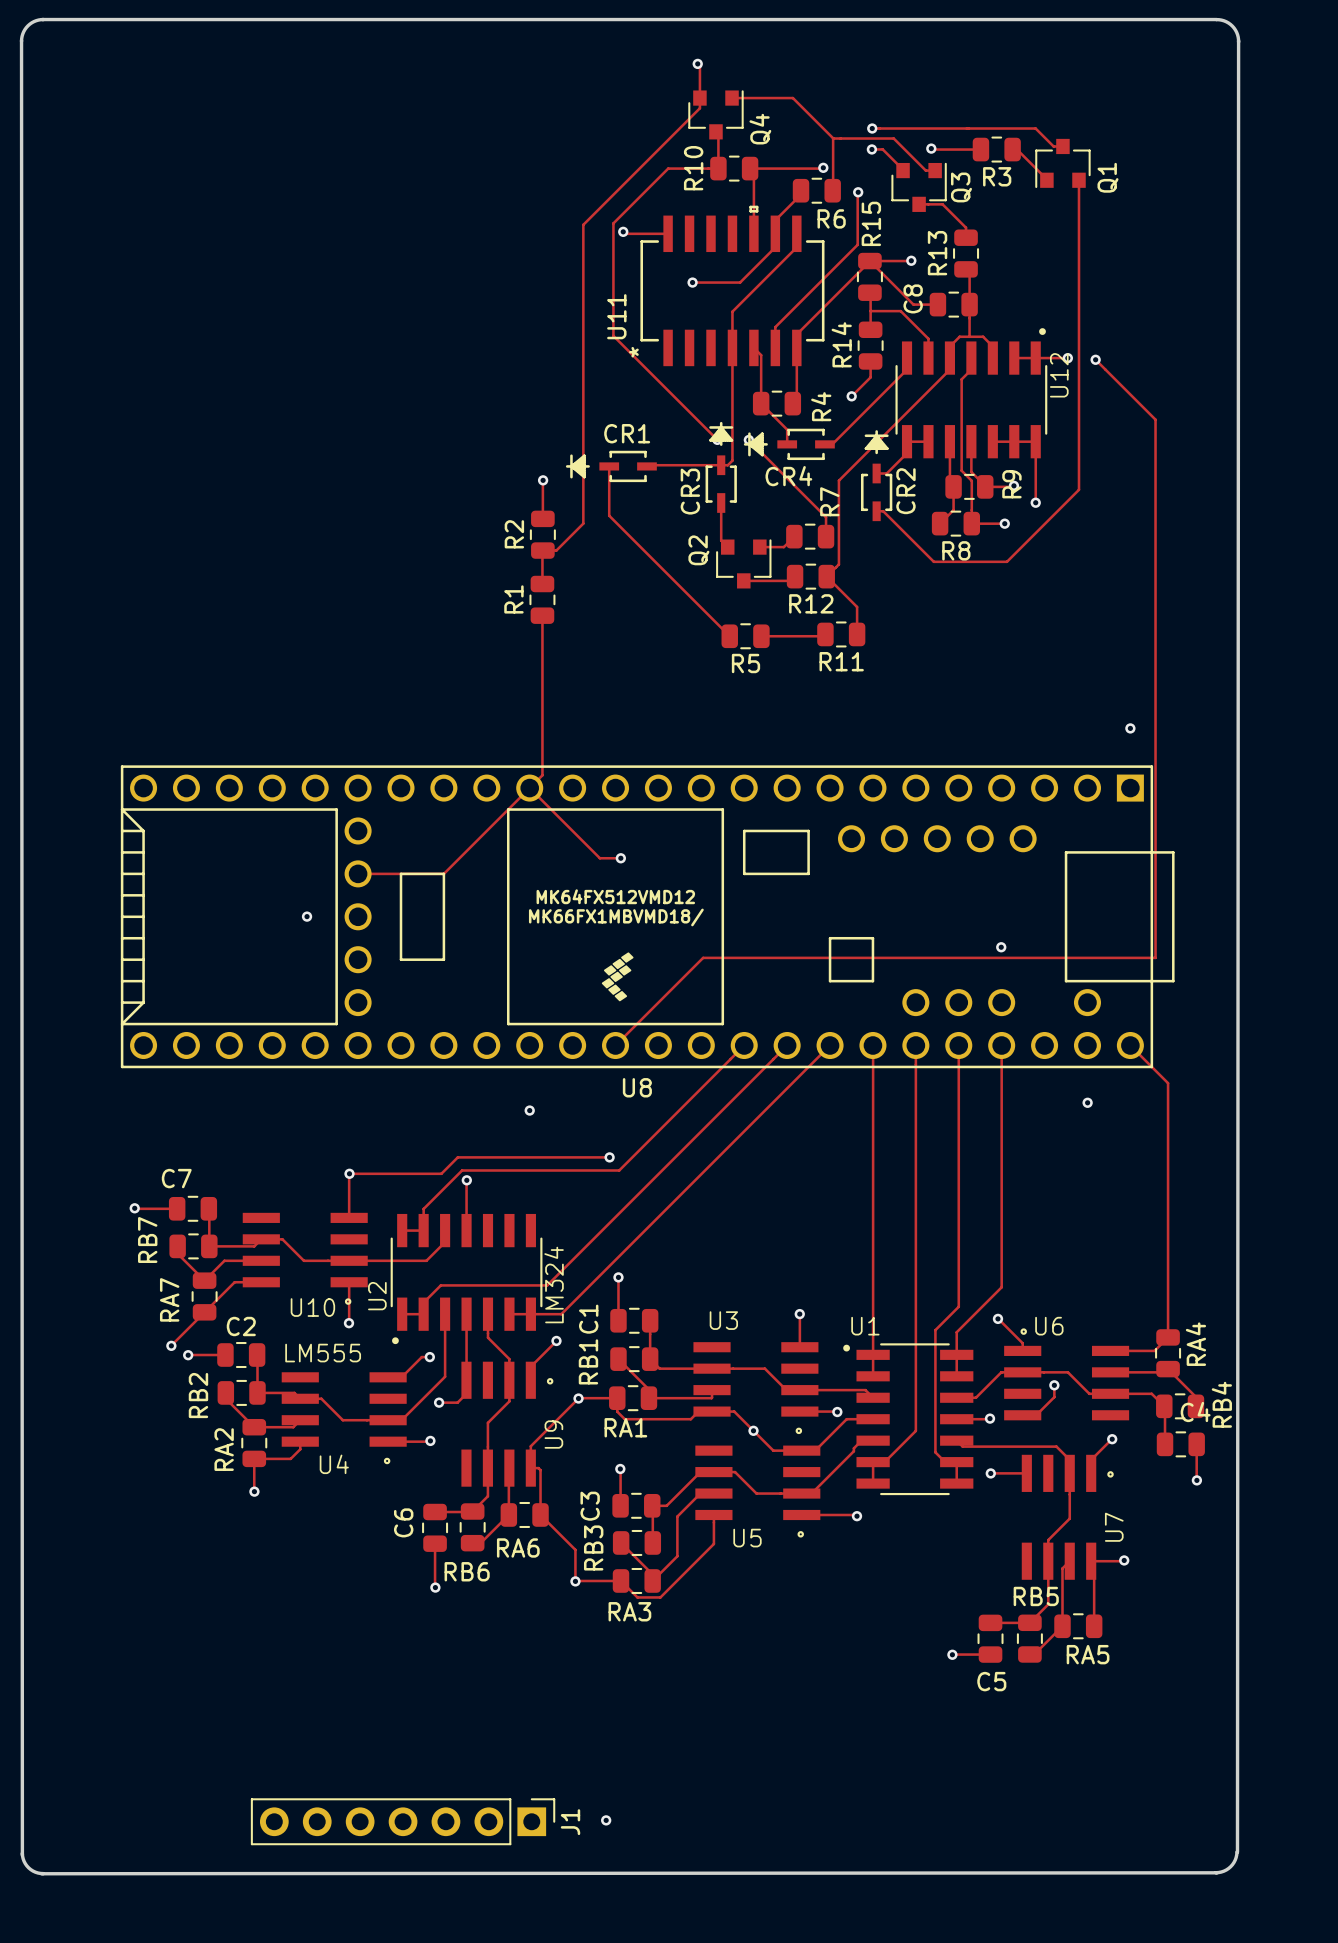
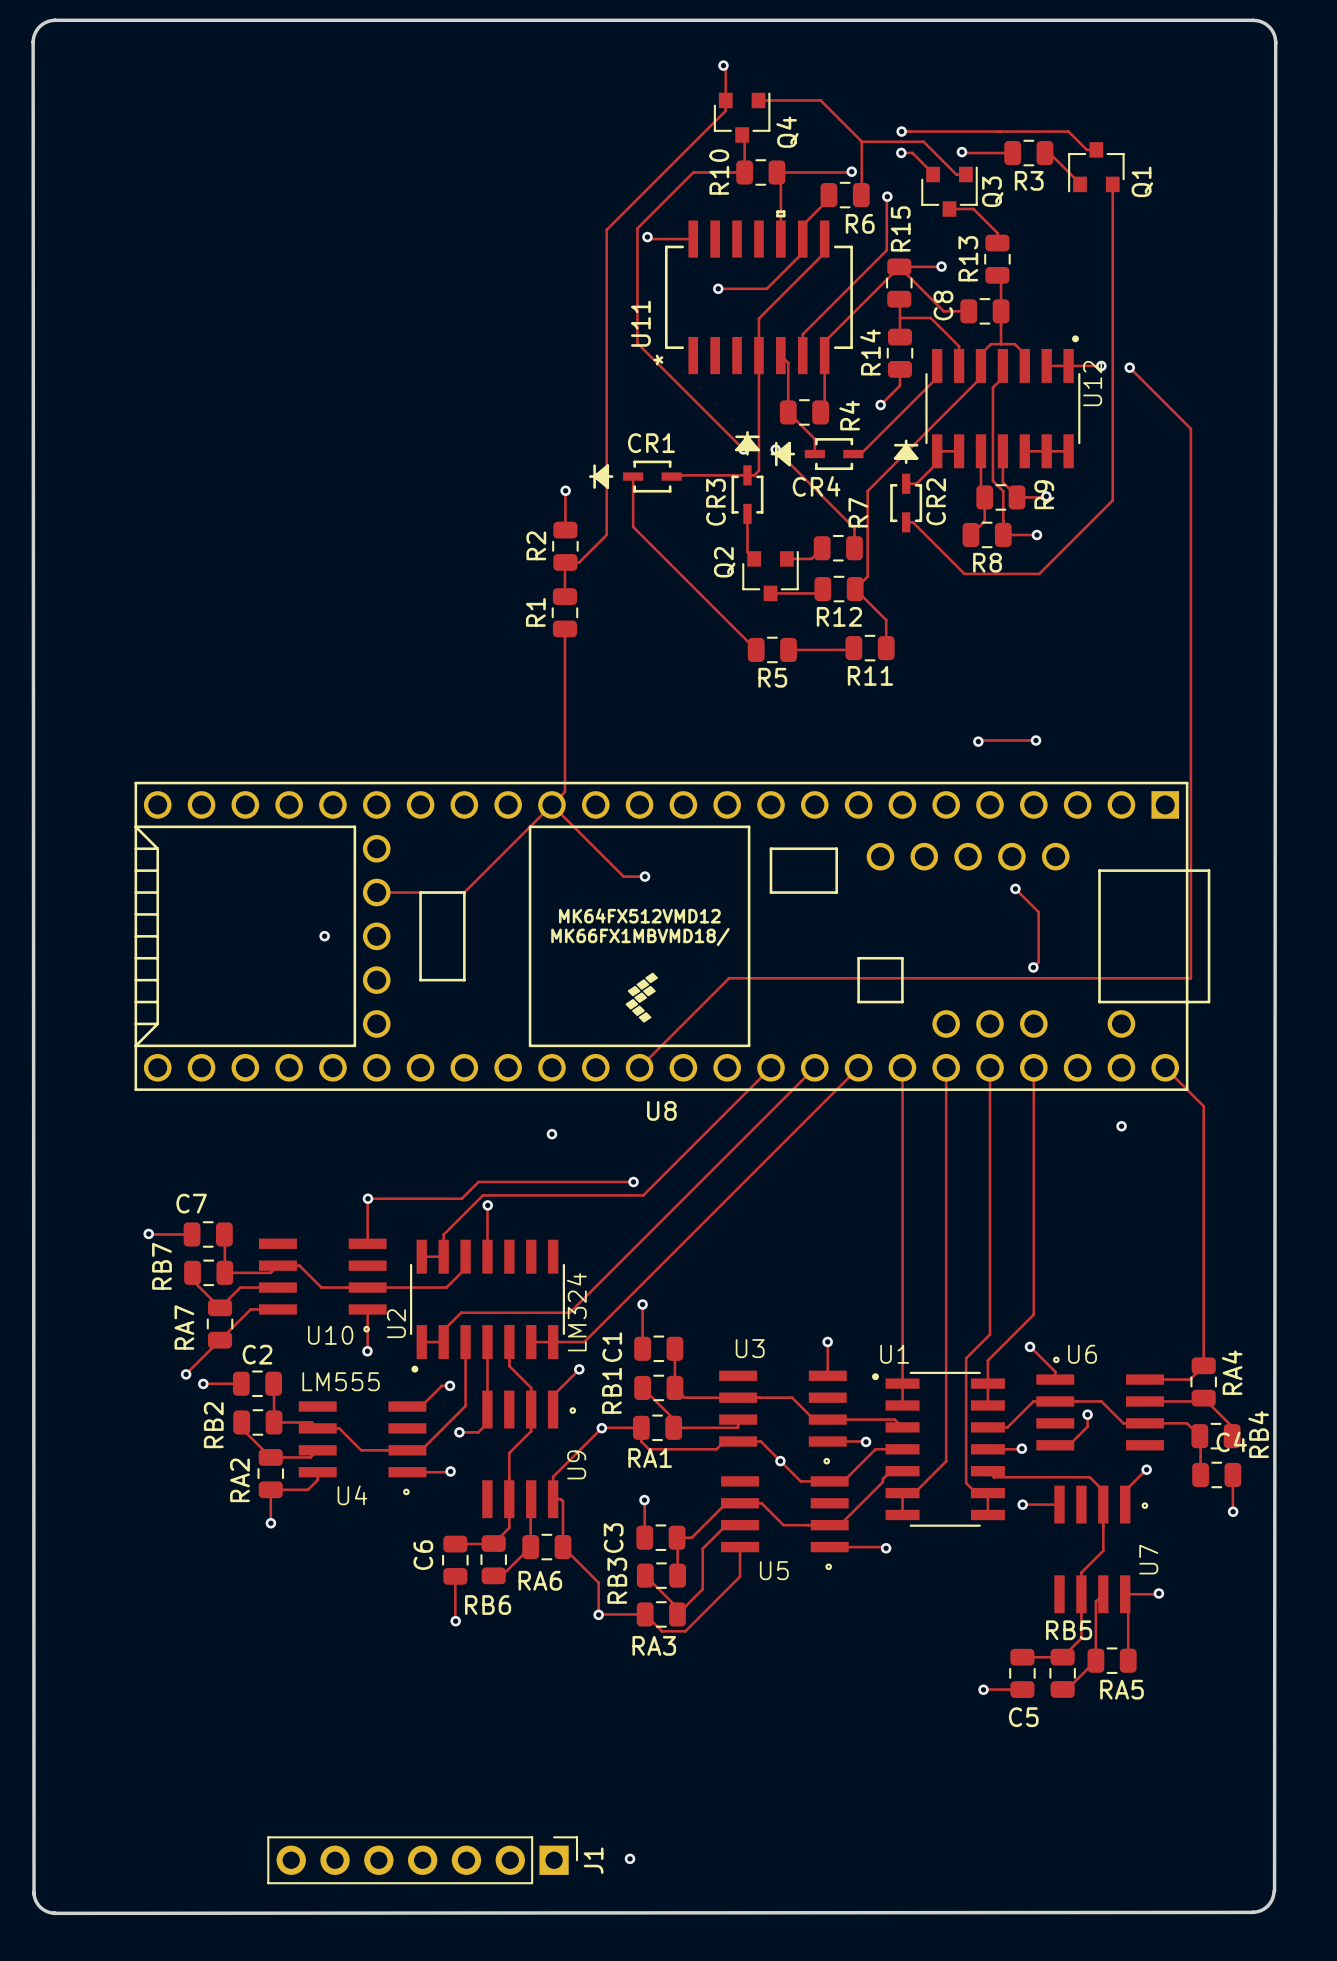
track: (1035, 441) (1035, 502) -> none
via: (1035, 502) -> none
track: none -> (1037, 739) (978, 741)
via: none -> (1036, 740)
via: none -> (978, 741)
via: (1130, 728) -> none
track: none -> (1015, 888) (1038, 912) (1038, 962) (1033, 967)
via: none -> (1015, 888)

